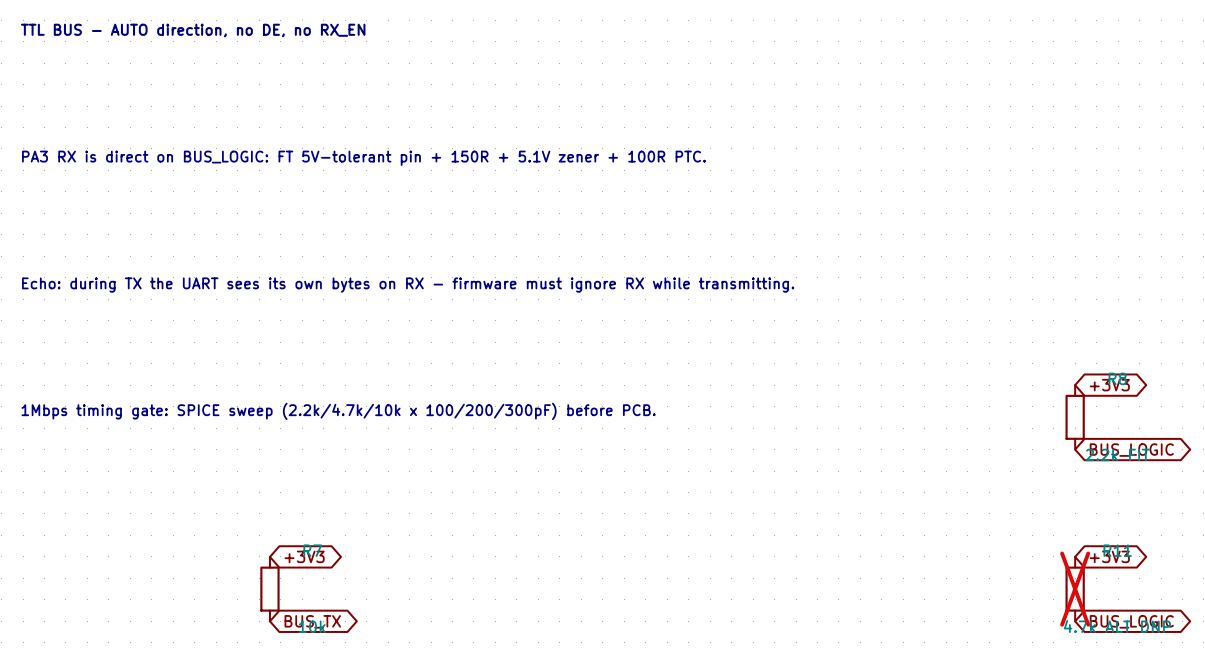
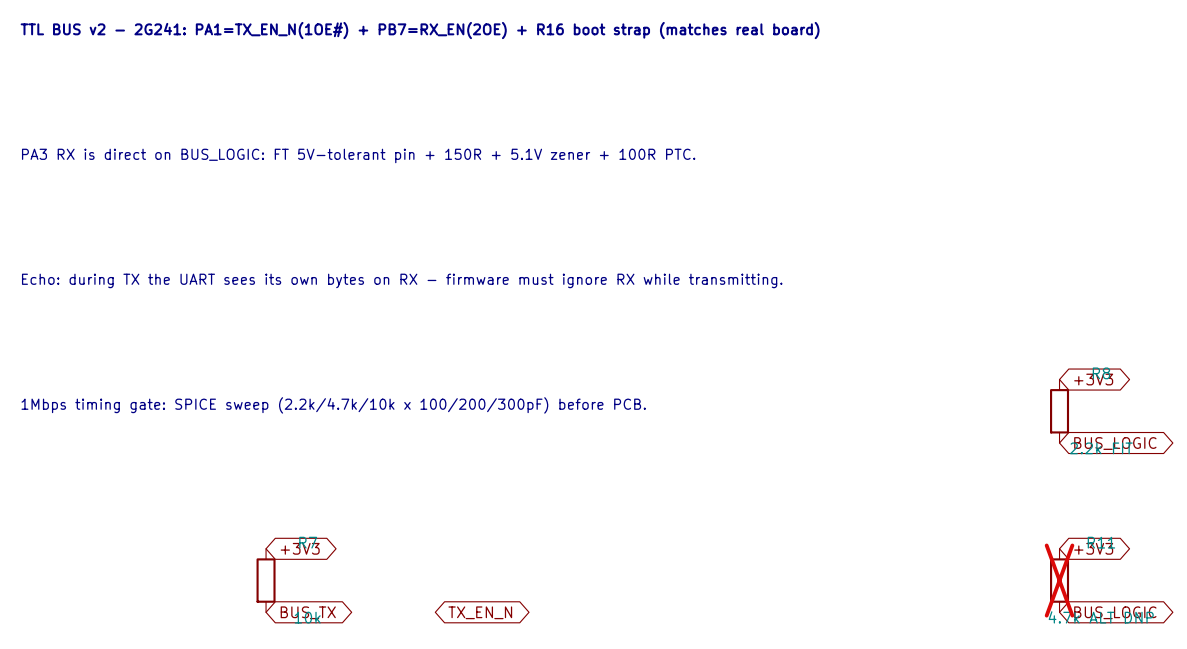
text: TTL BUS - AUTO direction, no DE, no RX_EN (193, 30) -> TTL BUS v2 - 2G241: PA1=TX_EN_N(1OE#) + PB7=RX_EN(2OE) + R16 boot strap (matches real board) (420, 30)
global label: none -> TX_EN_N (480, 612)

